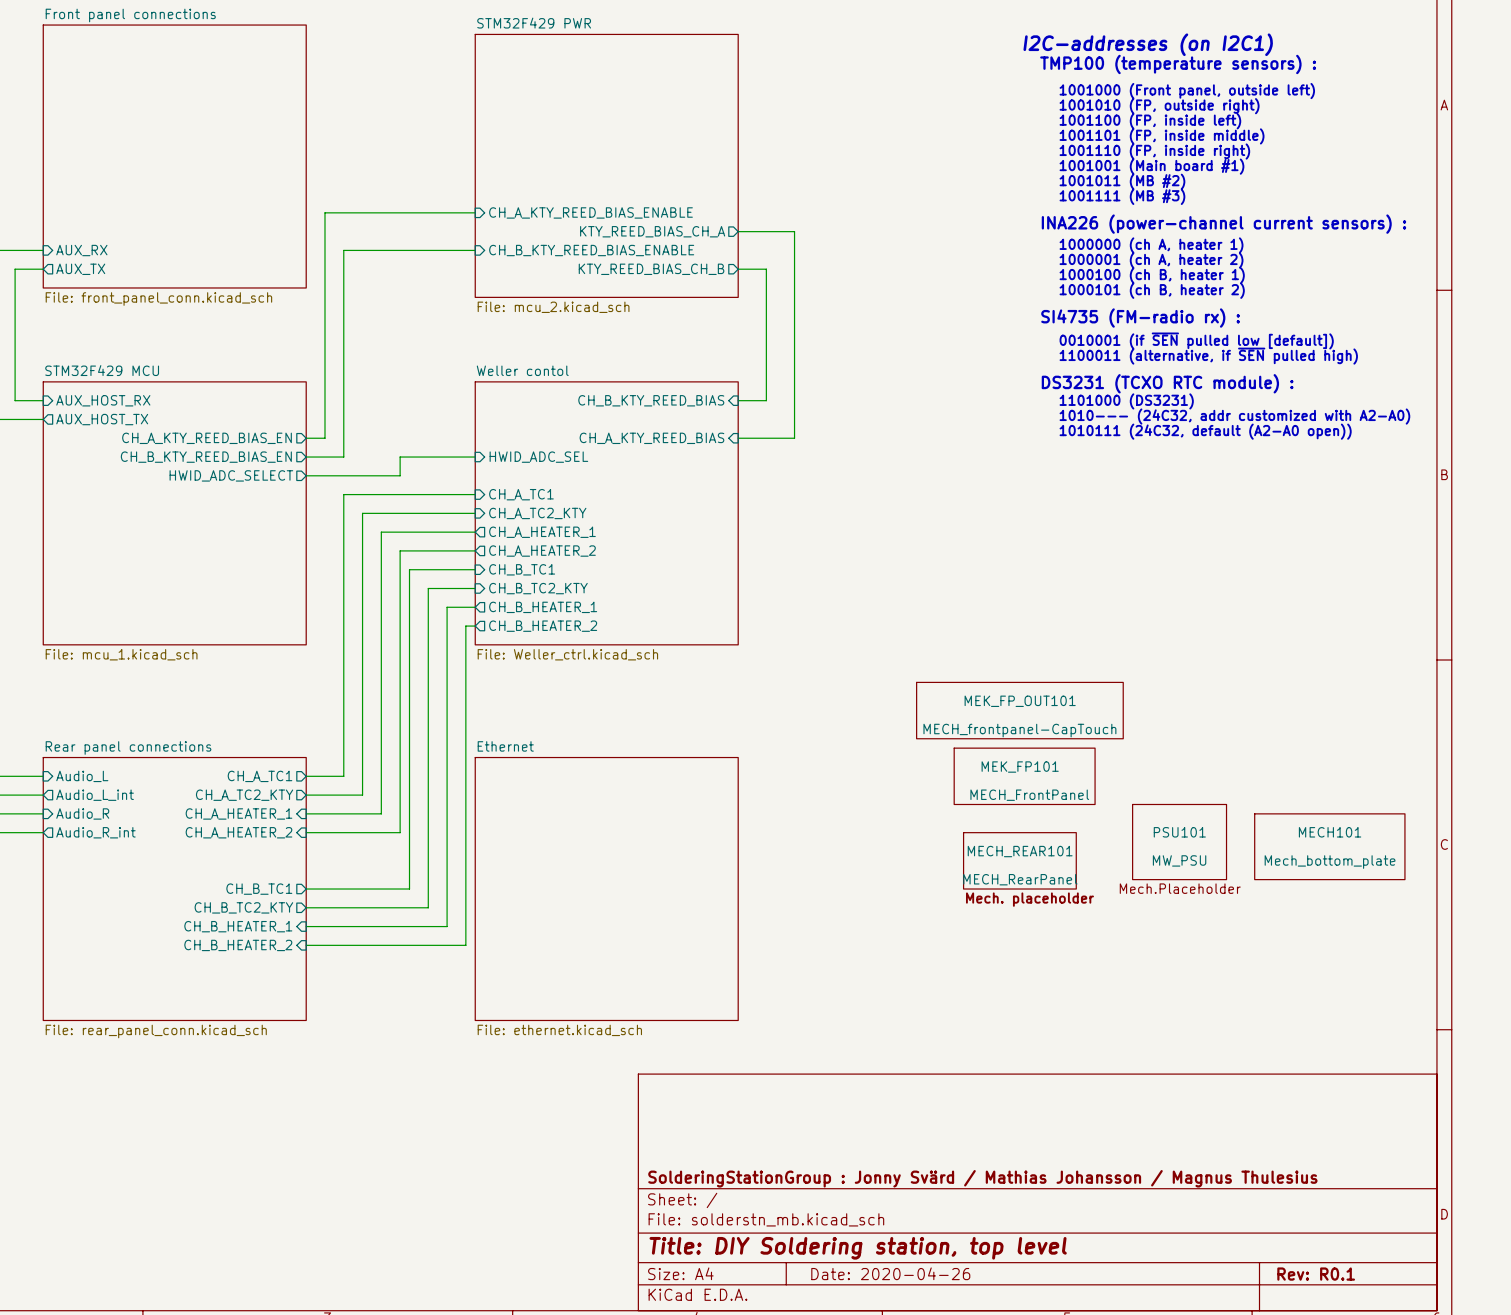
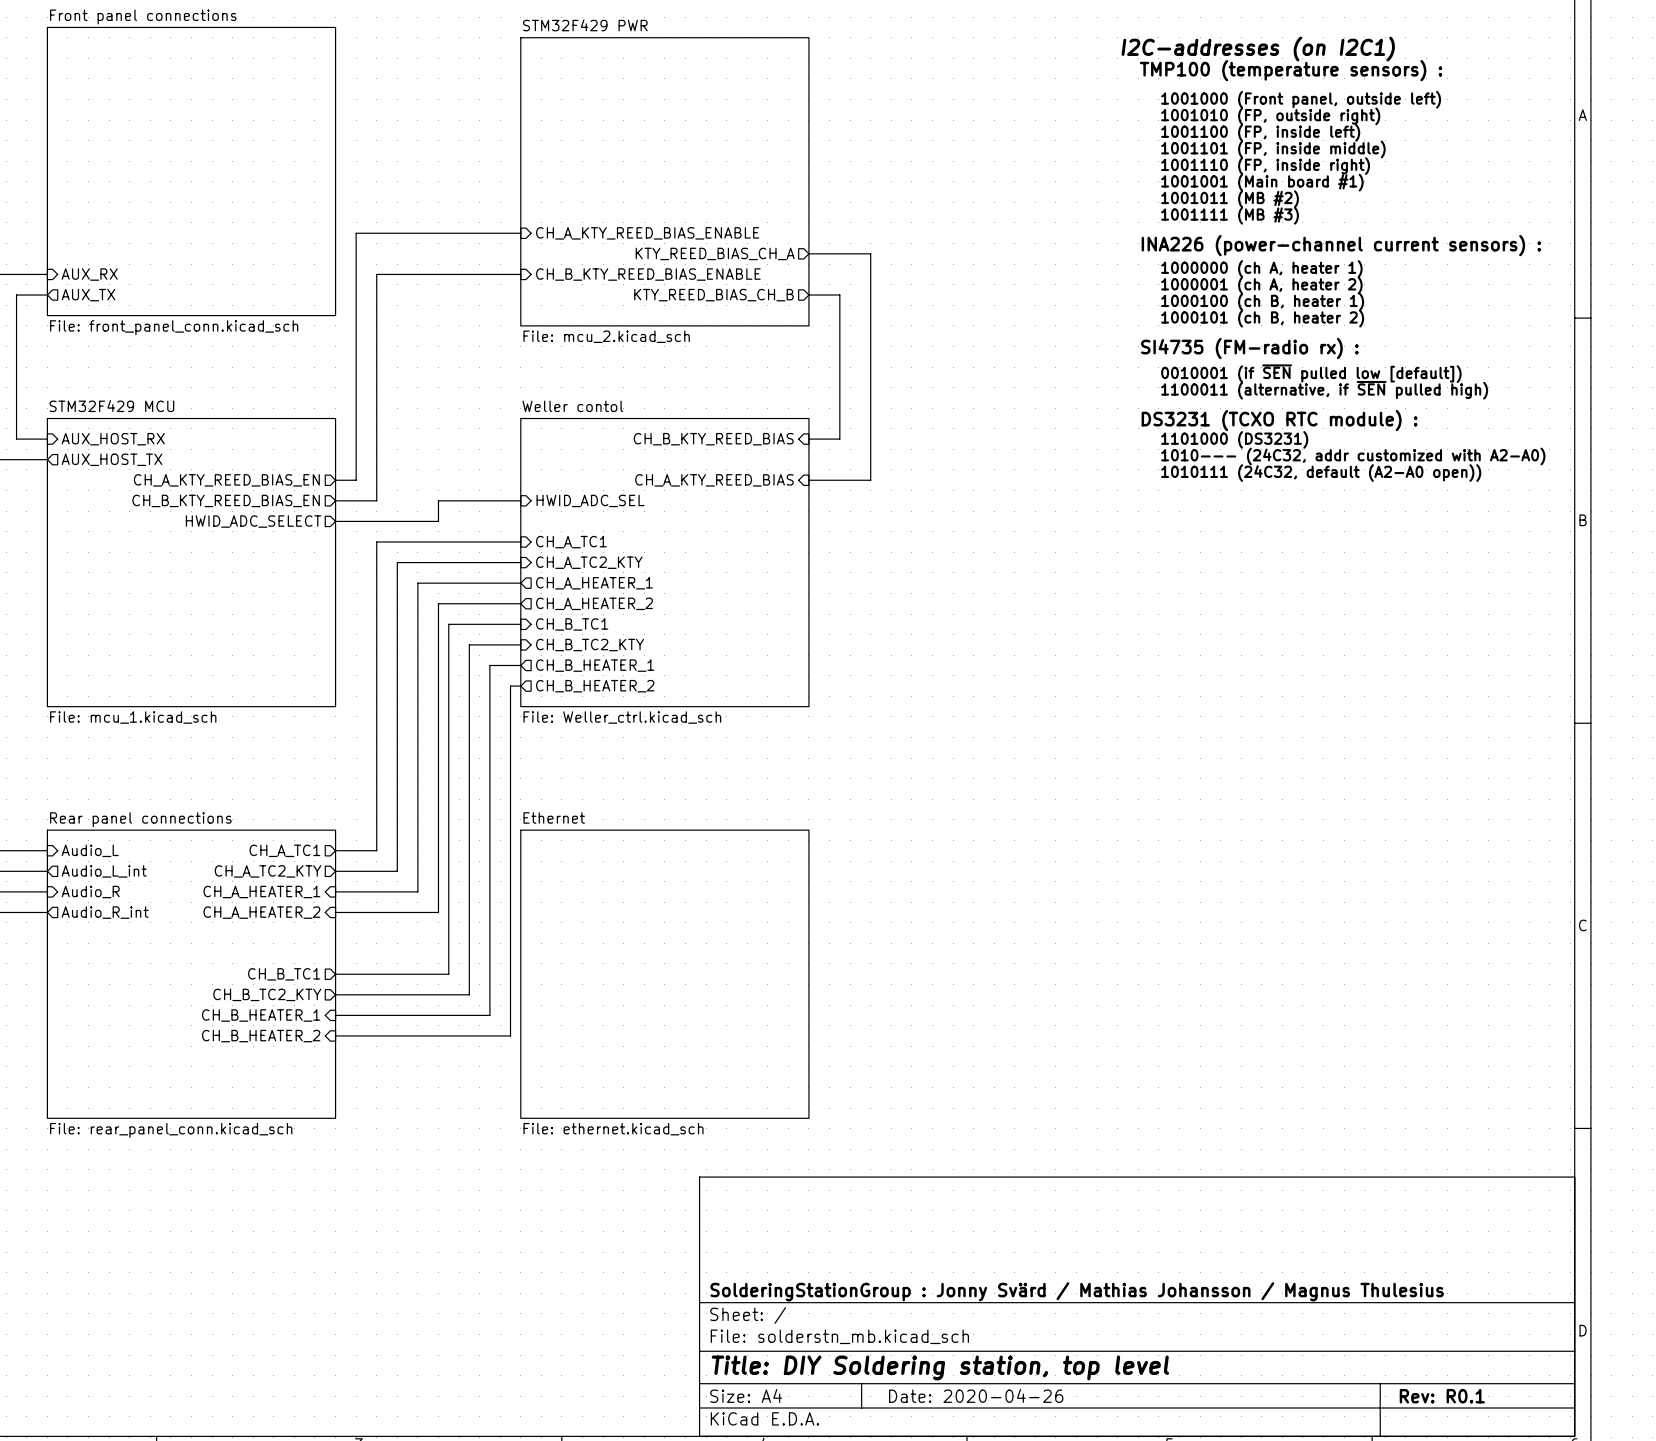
MEK_FP_OUT101: MECH_frontpanel-CapTouch (1019, 710) -> none
MEK_FP101: MECH_FrontPanel (1024, 776) -> none
PSU101: MW_PSU (1179, 842) -> none
MECH101: Mech_bottom_plate (1329, 846) -> none
MECH_REAR101: MECH_RearPanel (1019, 860) -> none

